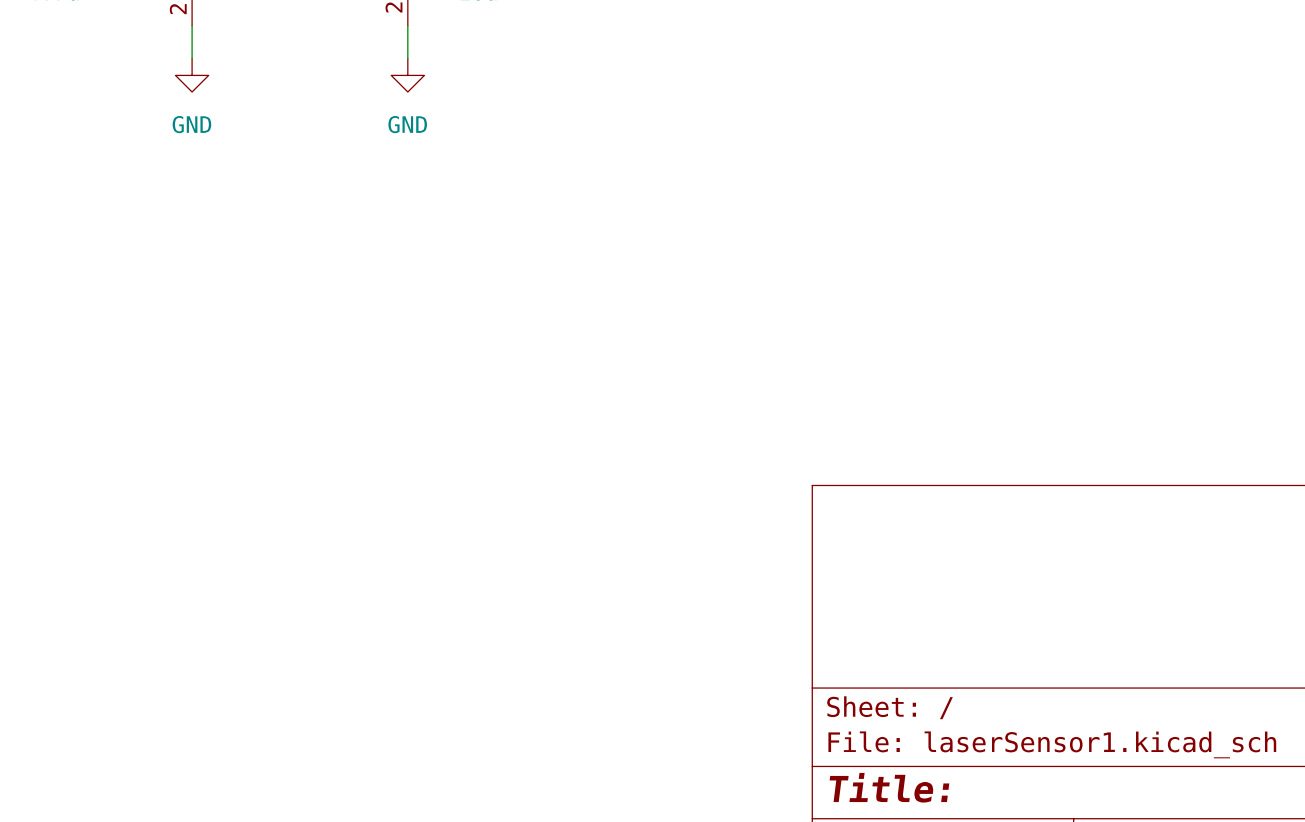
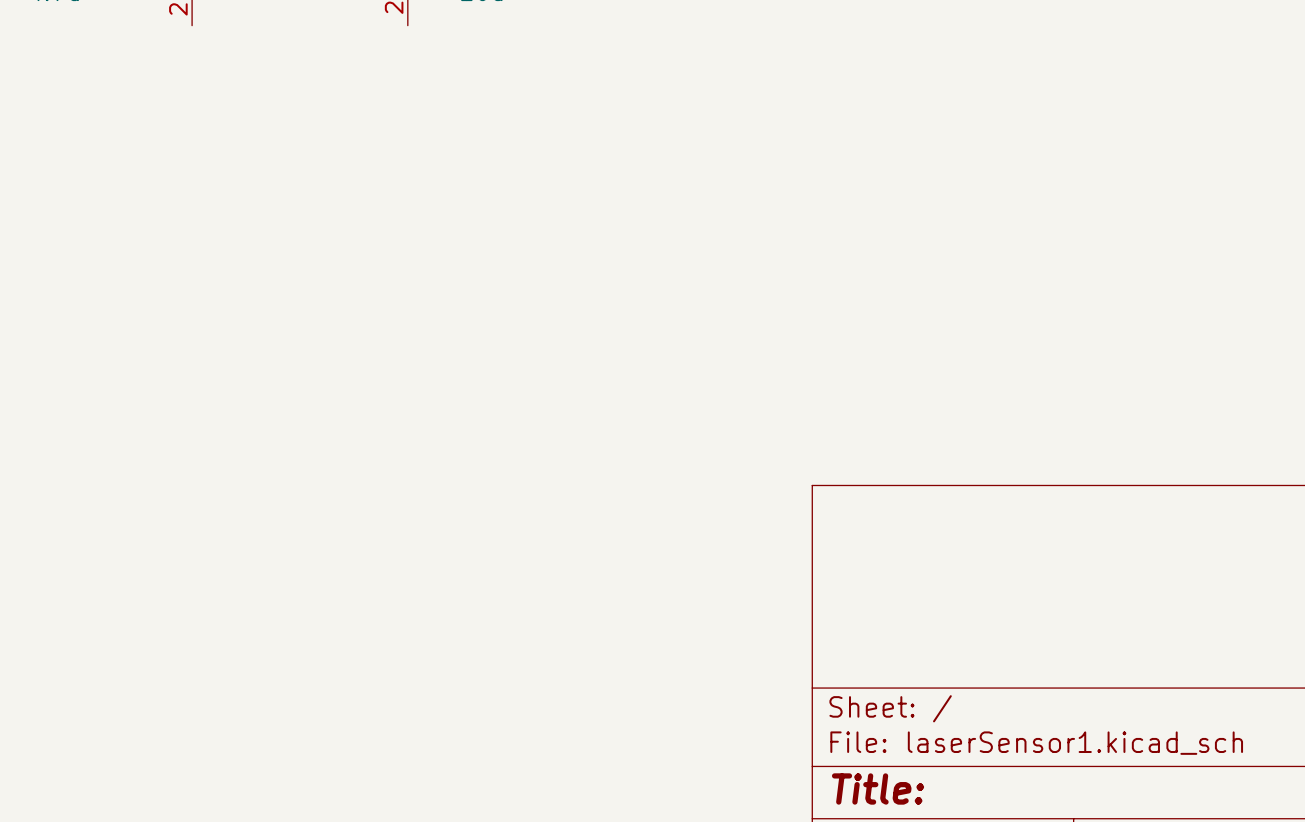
wire: (192, 25) (192, 58) -> none
wire: (407, 25) (407, 58) -> none
power symbol: GND (192, 75) -> none
power symbol: GND (407, 75) -> none

